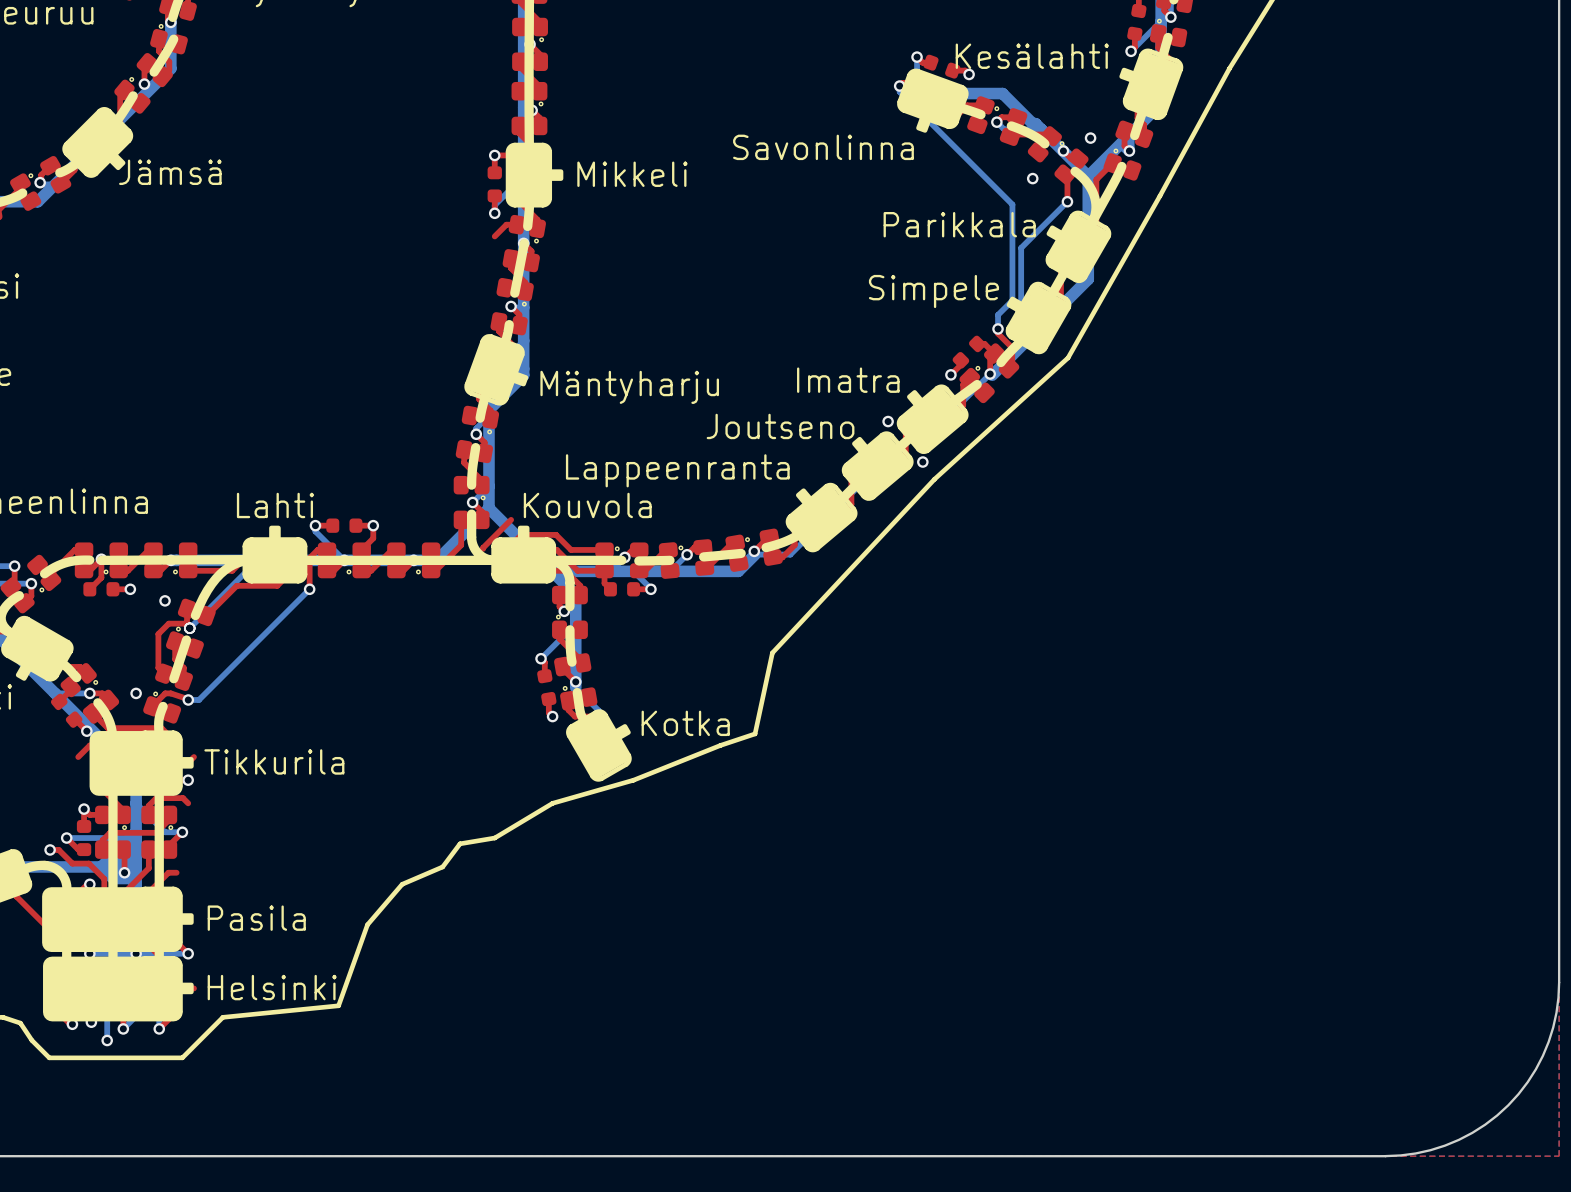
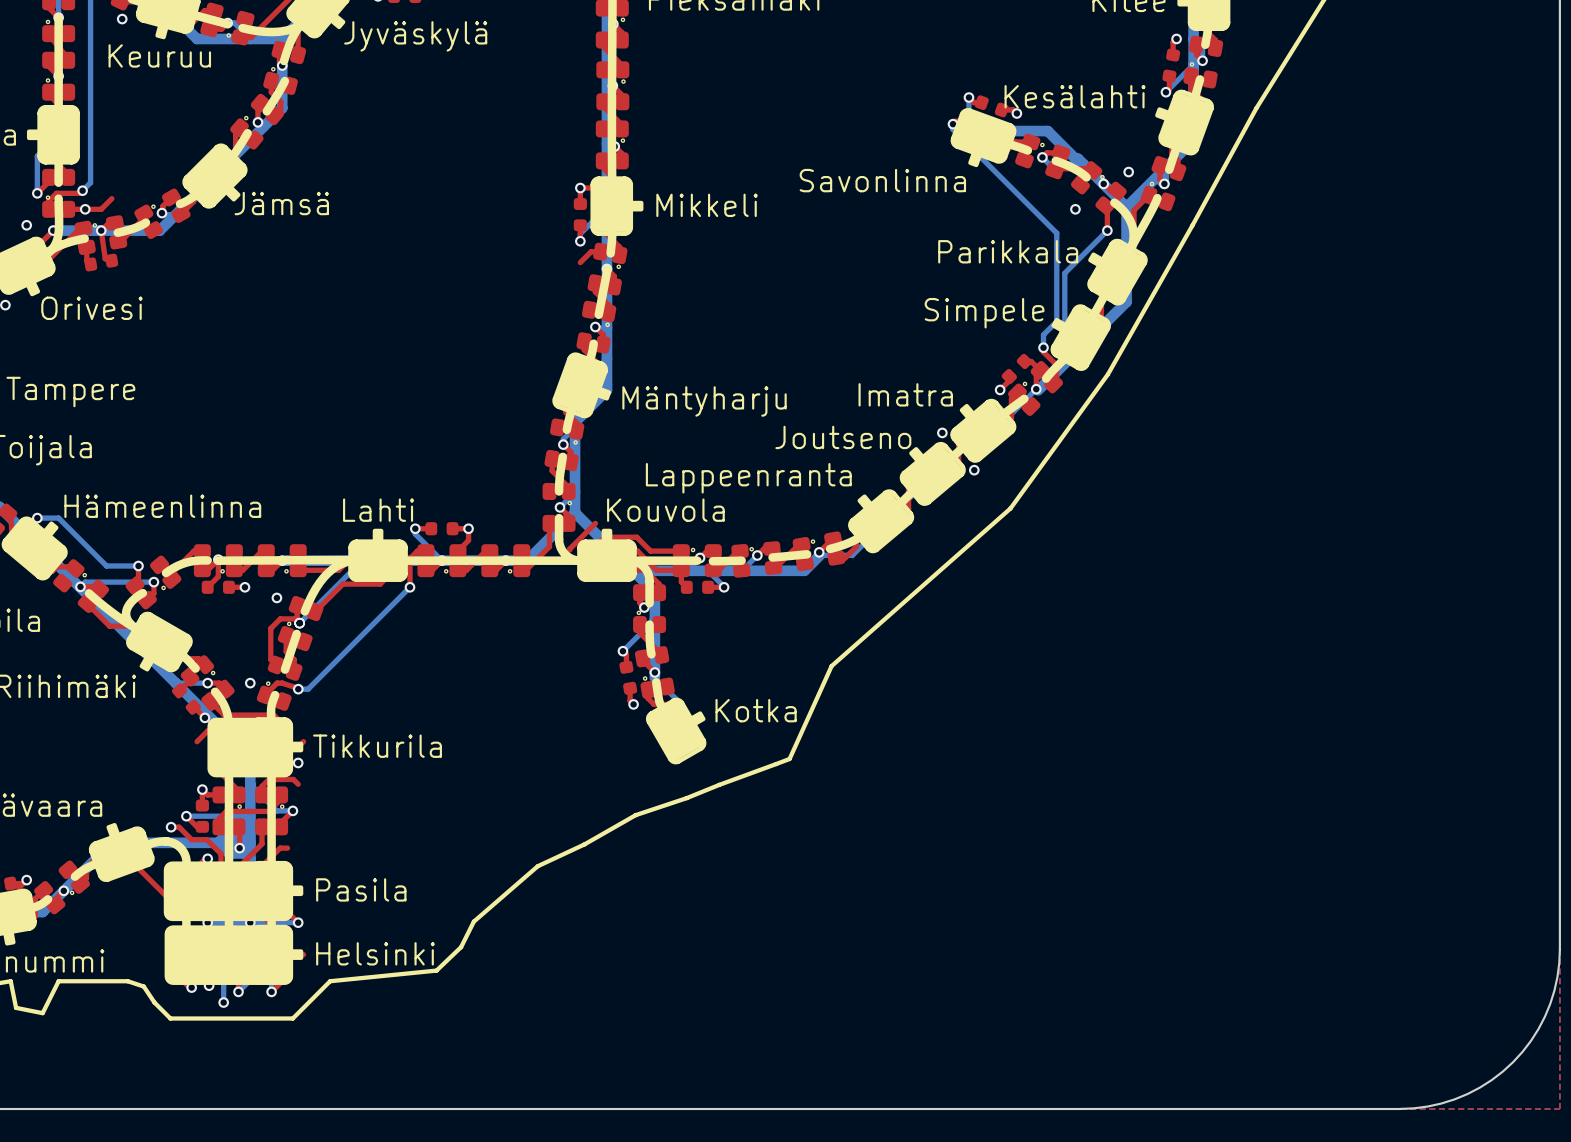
line: (1068, 357) (934, 479) (772, 652) (755, 733) (720, 745) (633, 780) (552, 803) (494, 838) (460, 843) (442, 866) (402, 884) (367, 924) (338, 1005) -> (1107, 374) (1010, 508) (831, 666) (789, 759) (686, 798) (635, 815) (584, 844) (537, 866) (473, 921) (461, 947) (436, 970)

